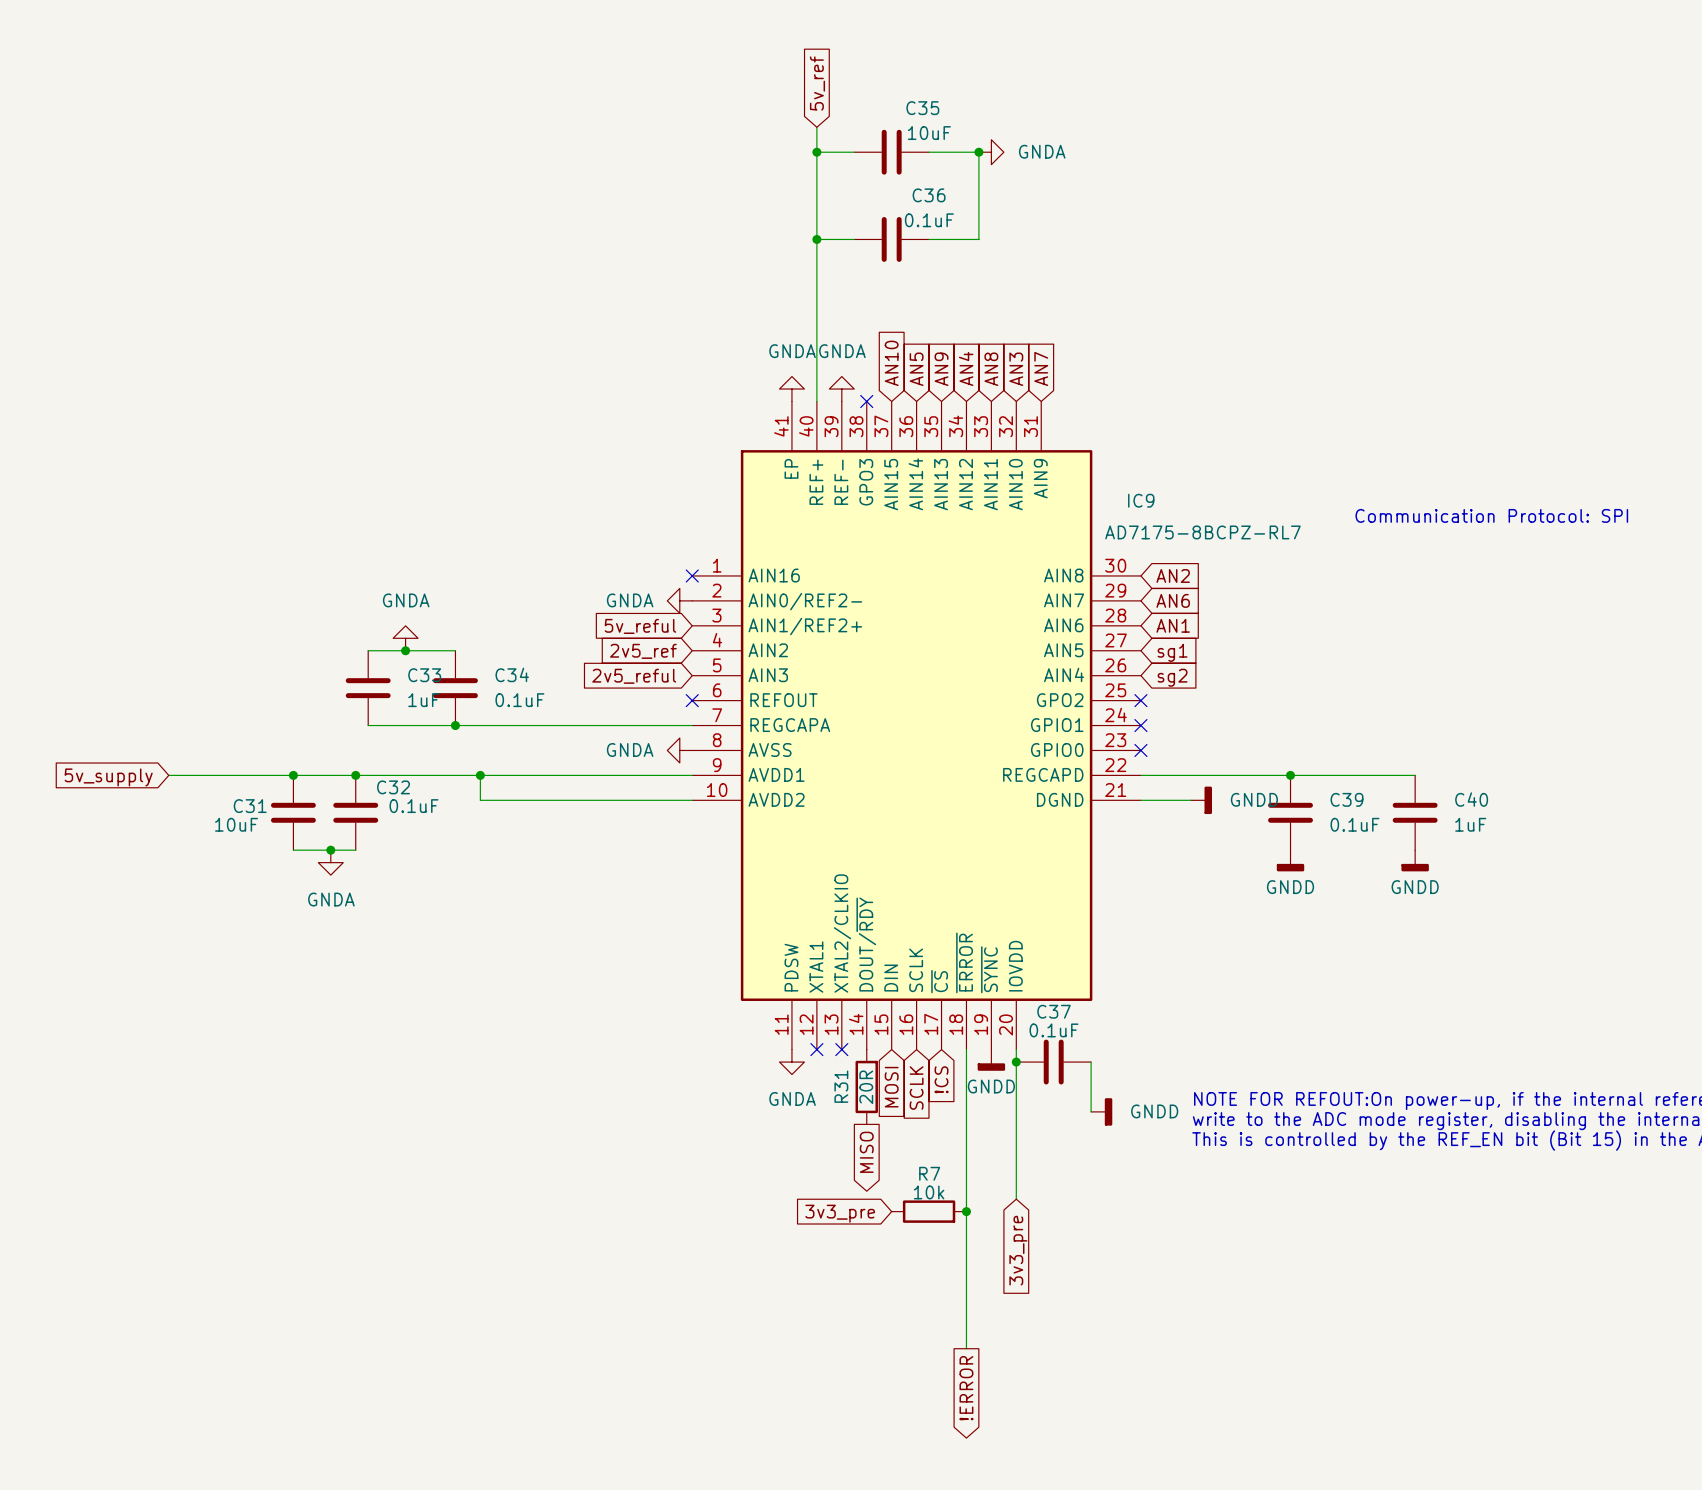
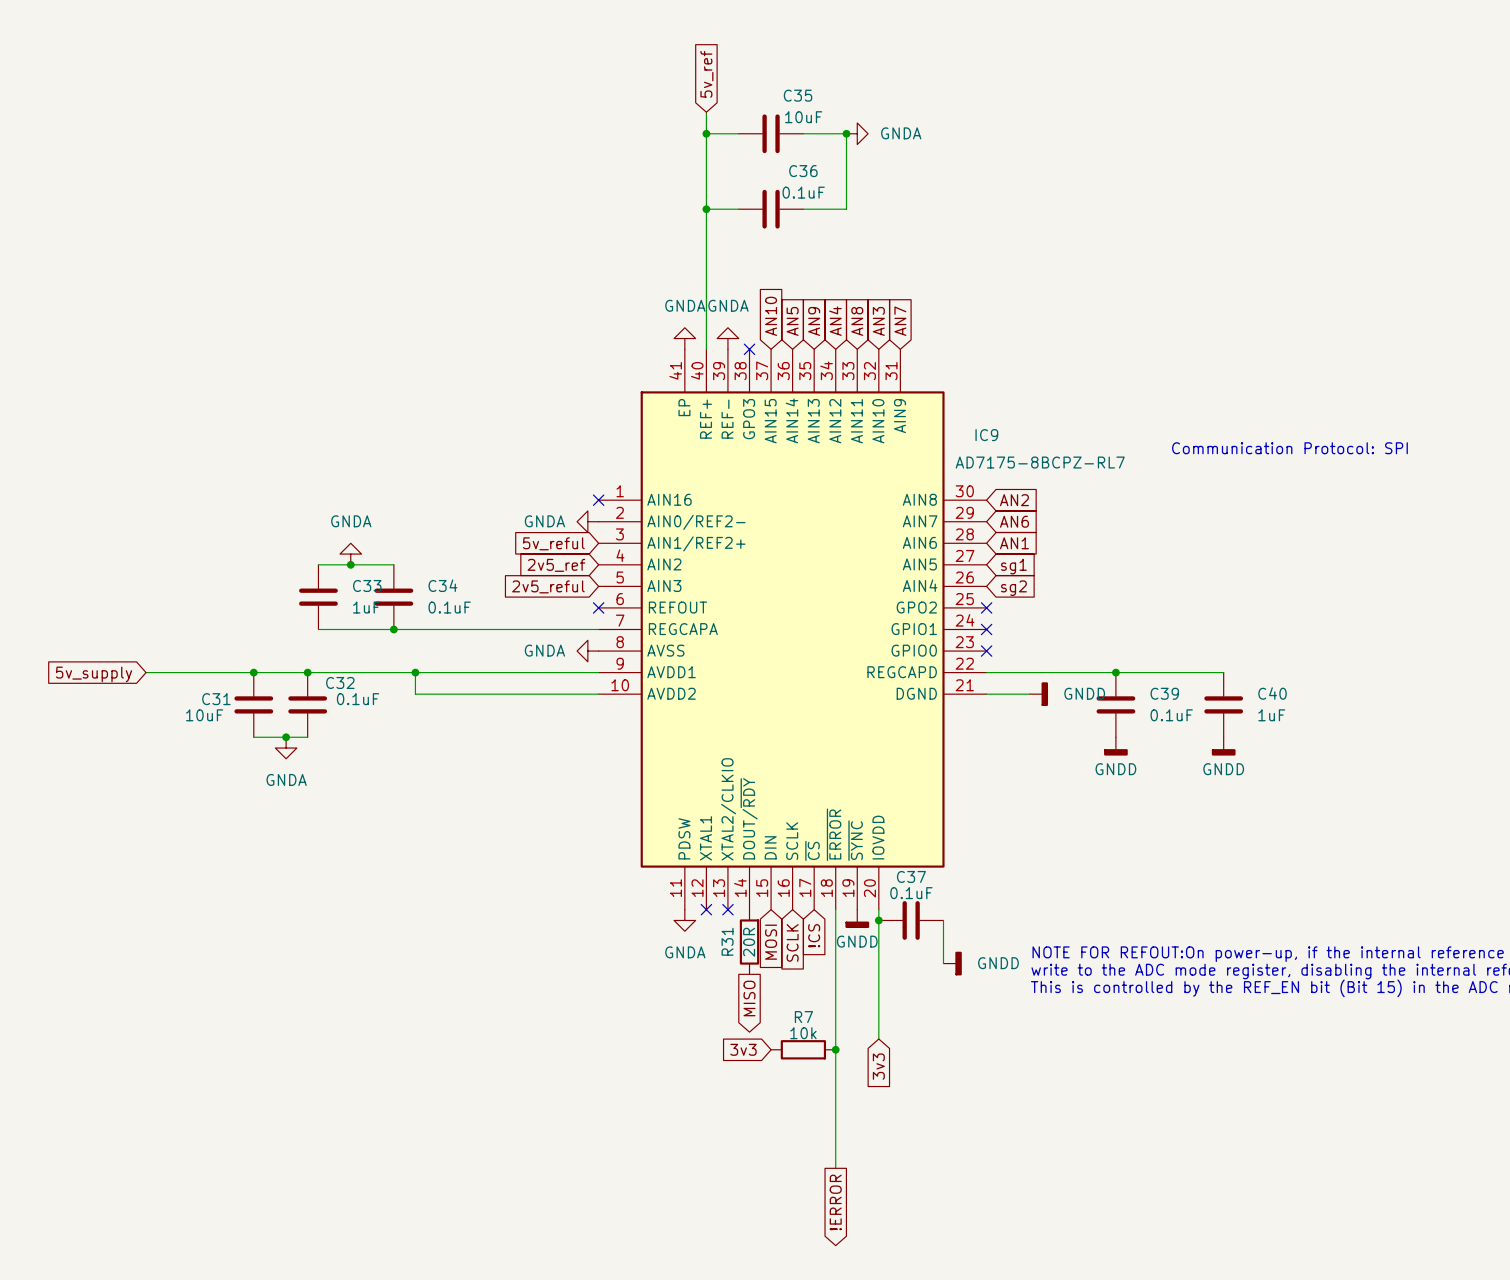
global label: 3v3_pre (840, 1213) -> 3v3 (743, 1049)
global label: 3v3_pre (1018, 1250) -> 3v3 (878, 1066)

